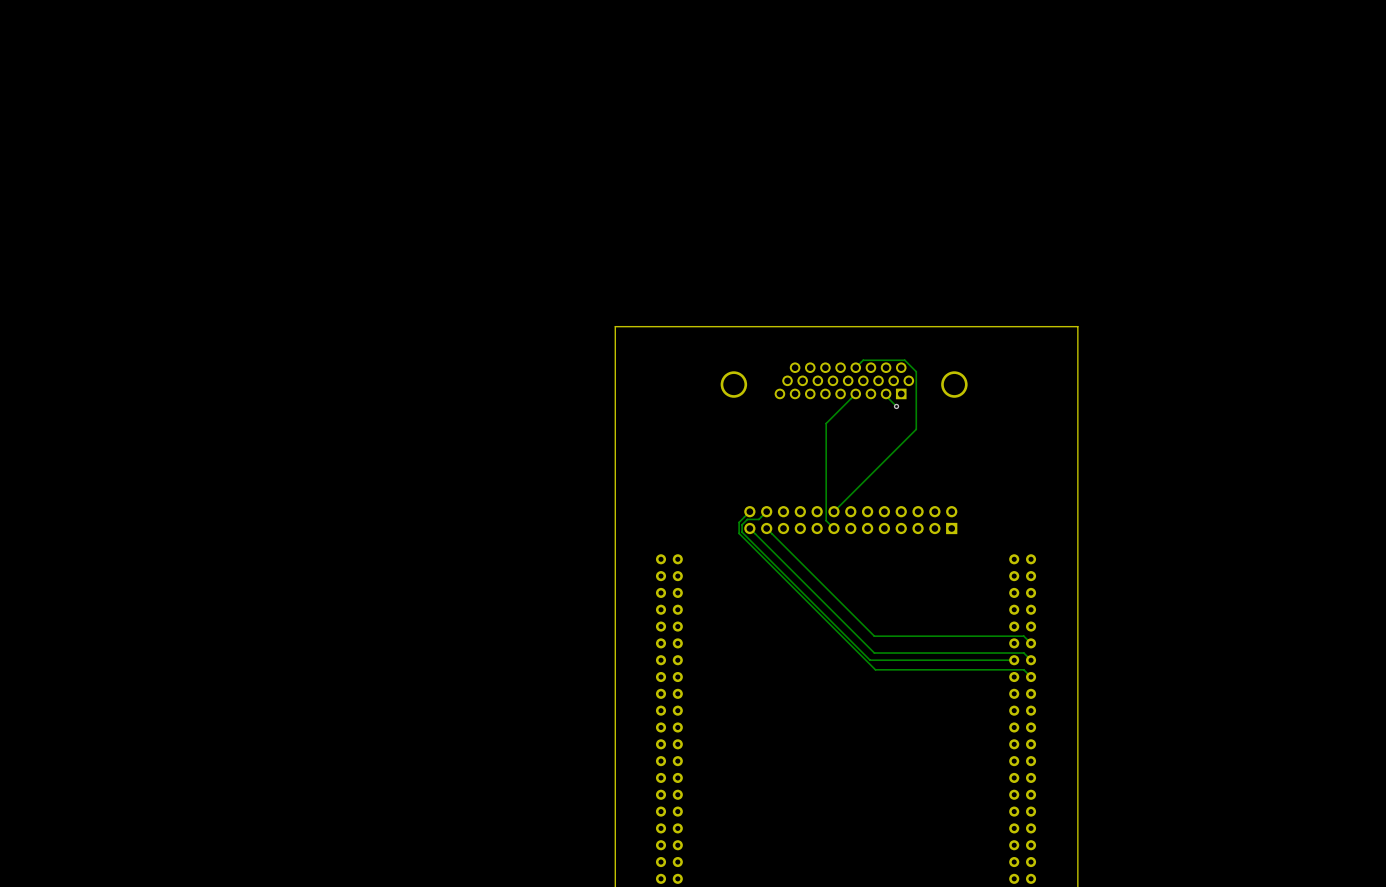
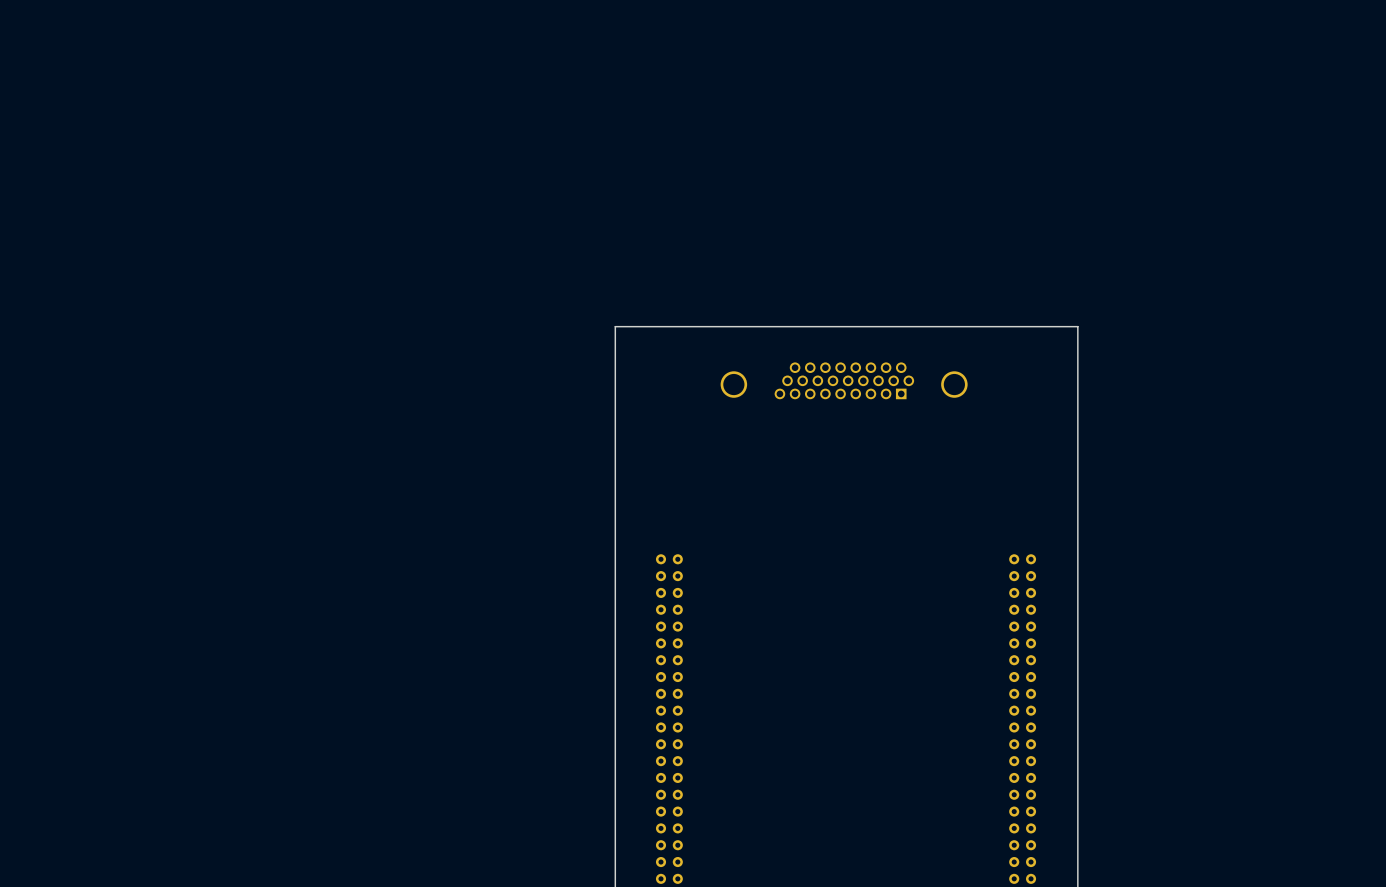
track: (855, 367) (863, 360) (904, 360) (916, 371) (916, 429) (833, 511) -> none
track: (855, 393) (826, 423) (826, 520) (833, 528) -> none
track: (886, 393) (896, 406) -> none
via: (896, 406) -> none
track: (749, 511) (739, 522) (739, 533) (875, 669) (1023, 669) (1031, 677) -> none
track: (766, 511) (758, 519) (747, 519) (742, 524) (742, 532) (870, 660) (1014, 660) -> none
part: (850, 520) -> none
track: (749, 528) (874, 653) (1023, 653) (1031, 660) -> none
track: (766, 528) (874, 636) (1023, 636) (1031, 643) -> none

